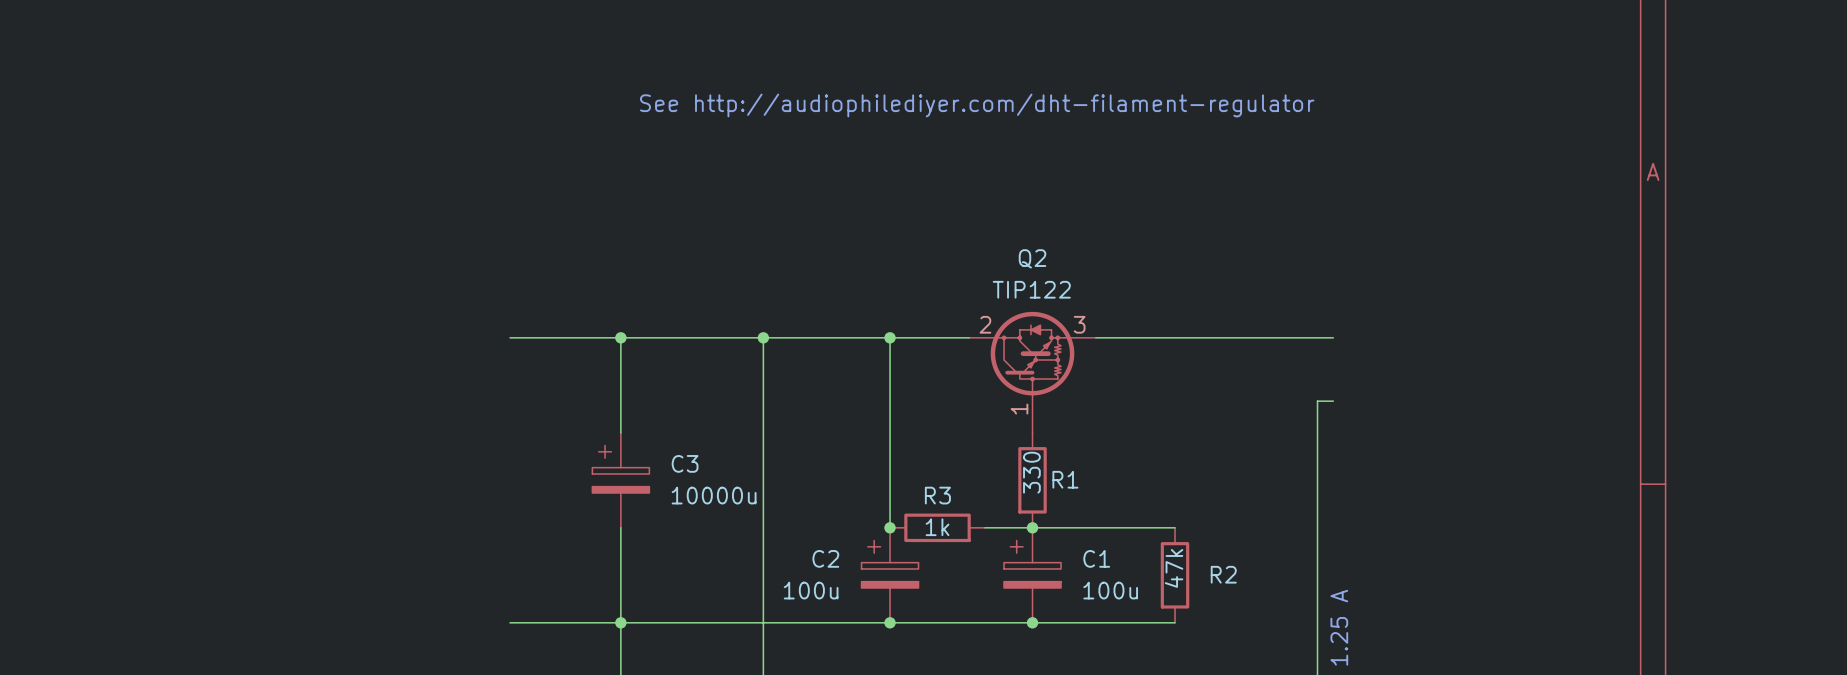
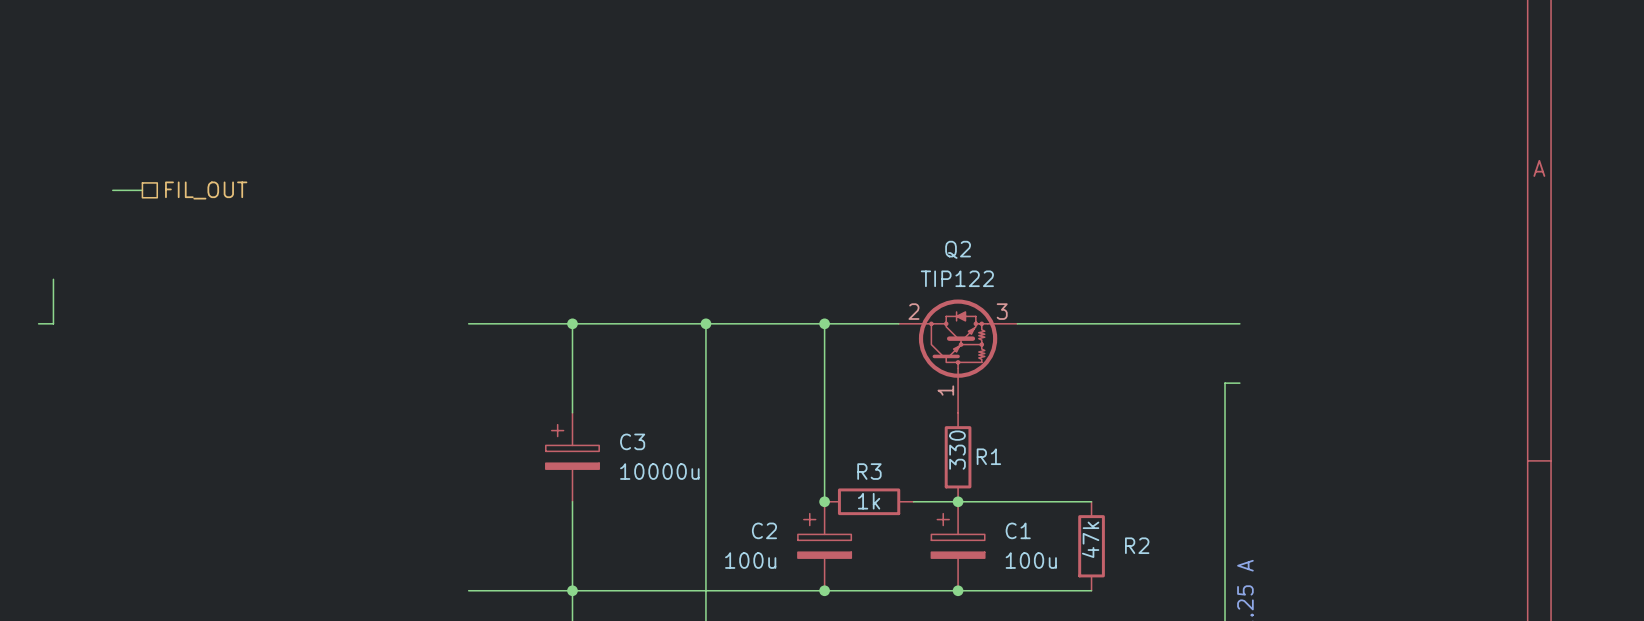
text: See http://audiophilediyer.com/dht-filament-regulator (977, 105) -> none
wire: none -> (112, 190) (142, 190)
hierarchical label: none -> FIL_OUT (206, 190)
wire: none -> (53, 279) (53, 323) (38, 323)

